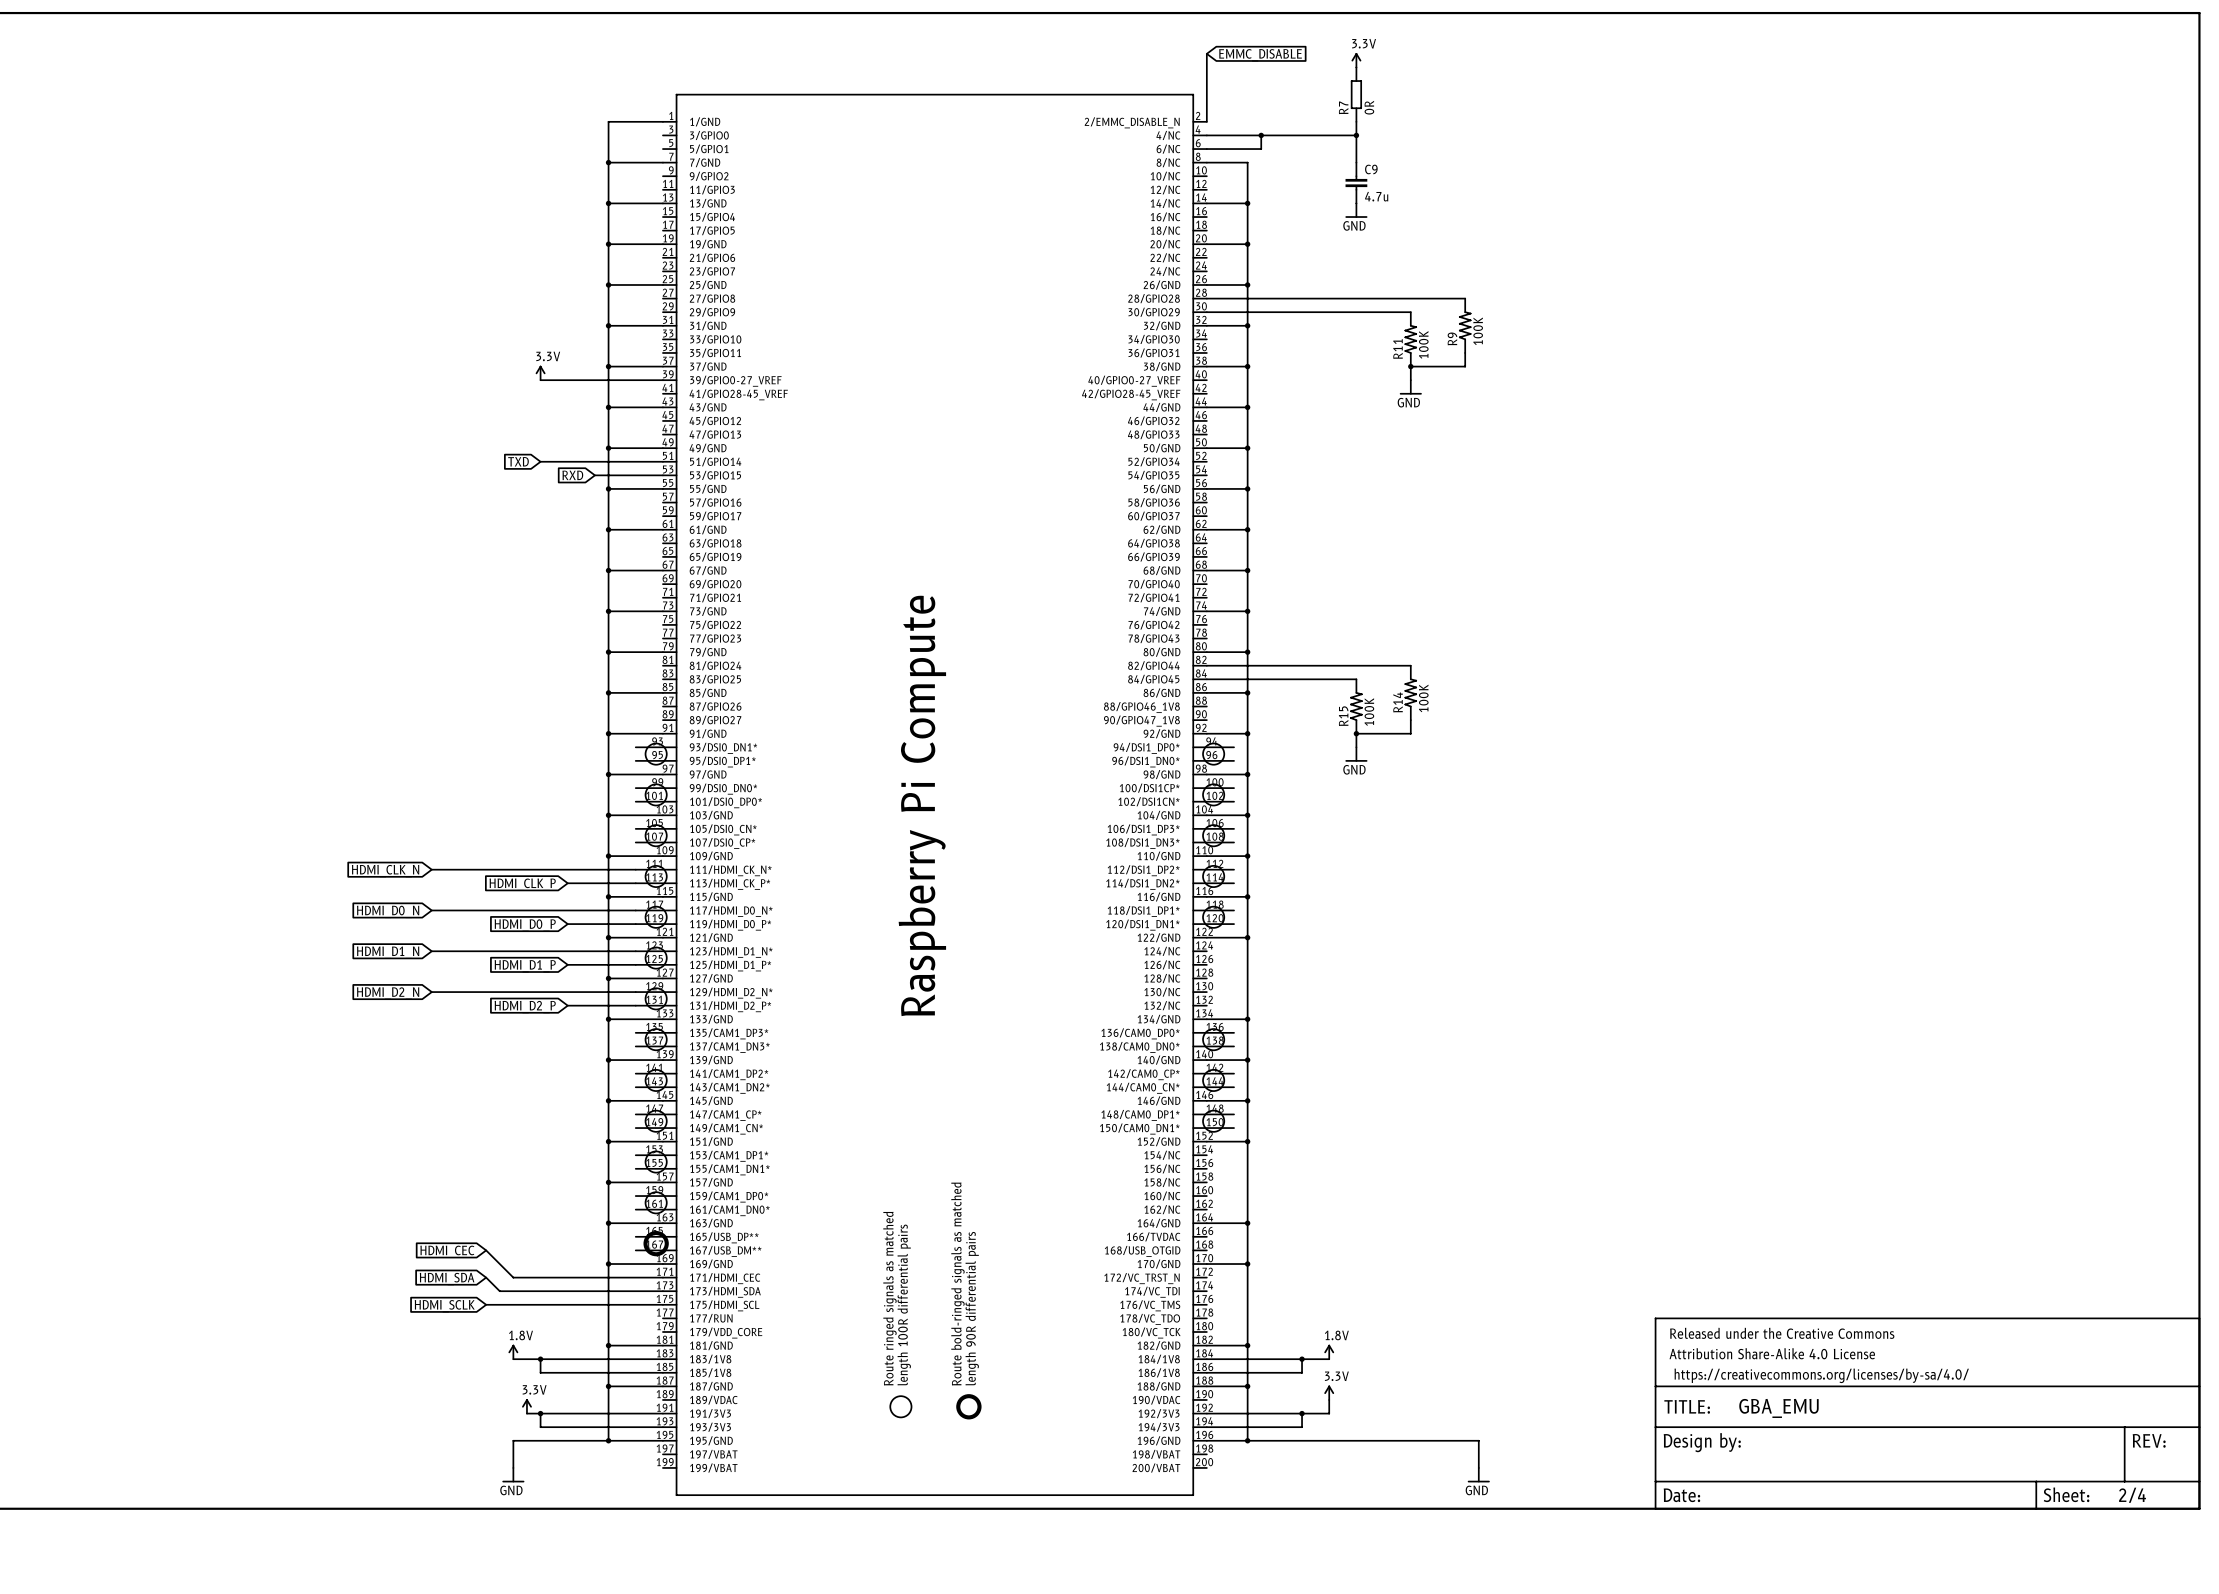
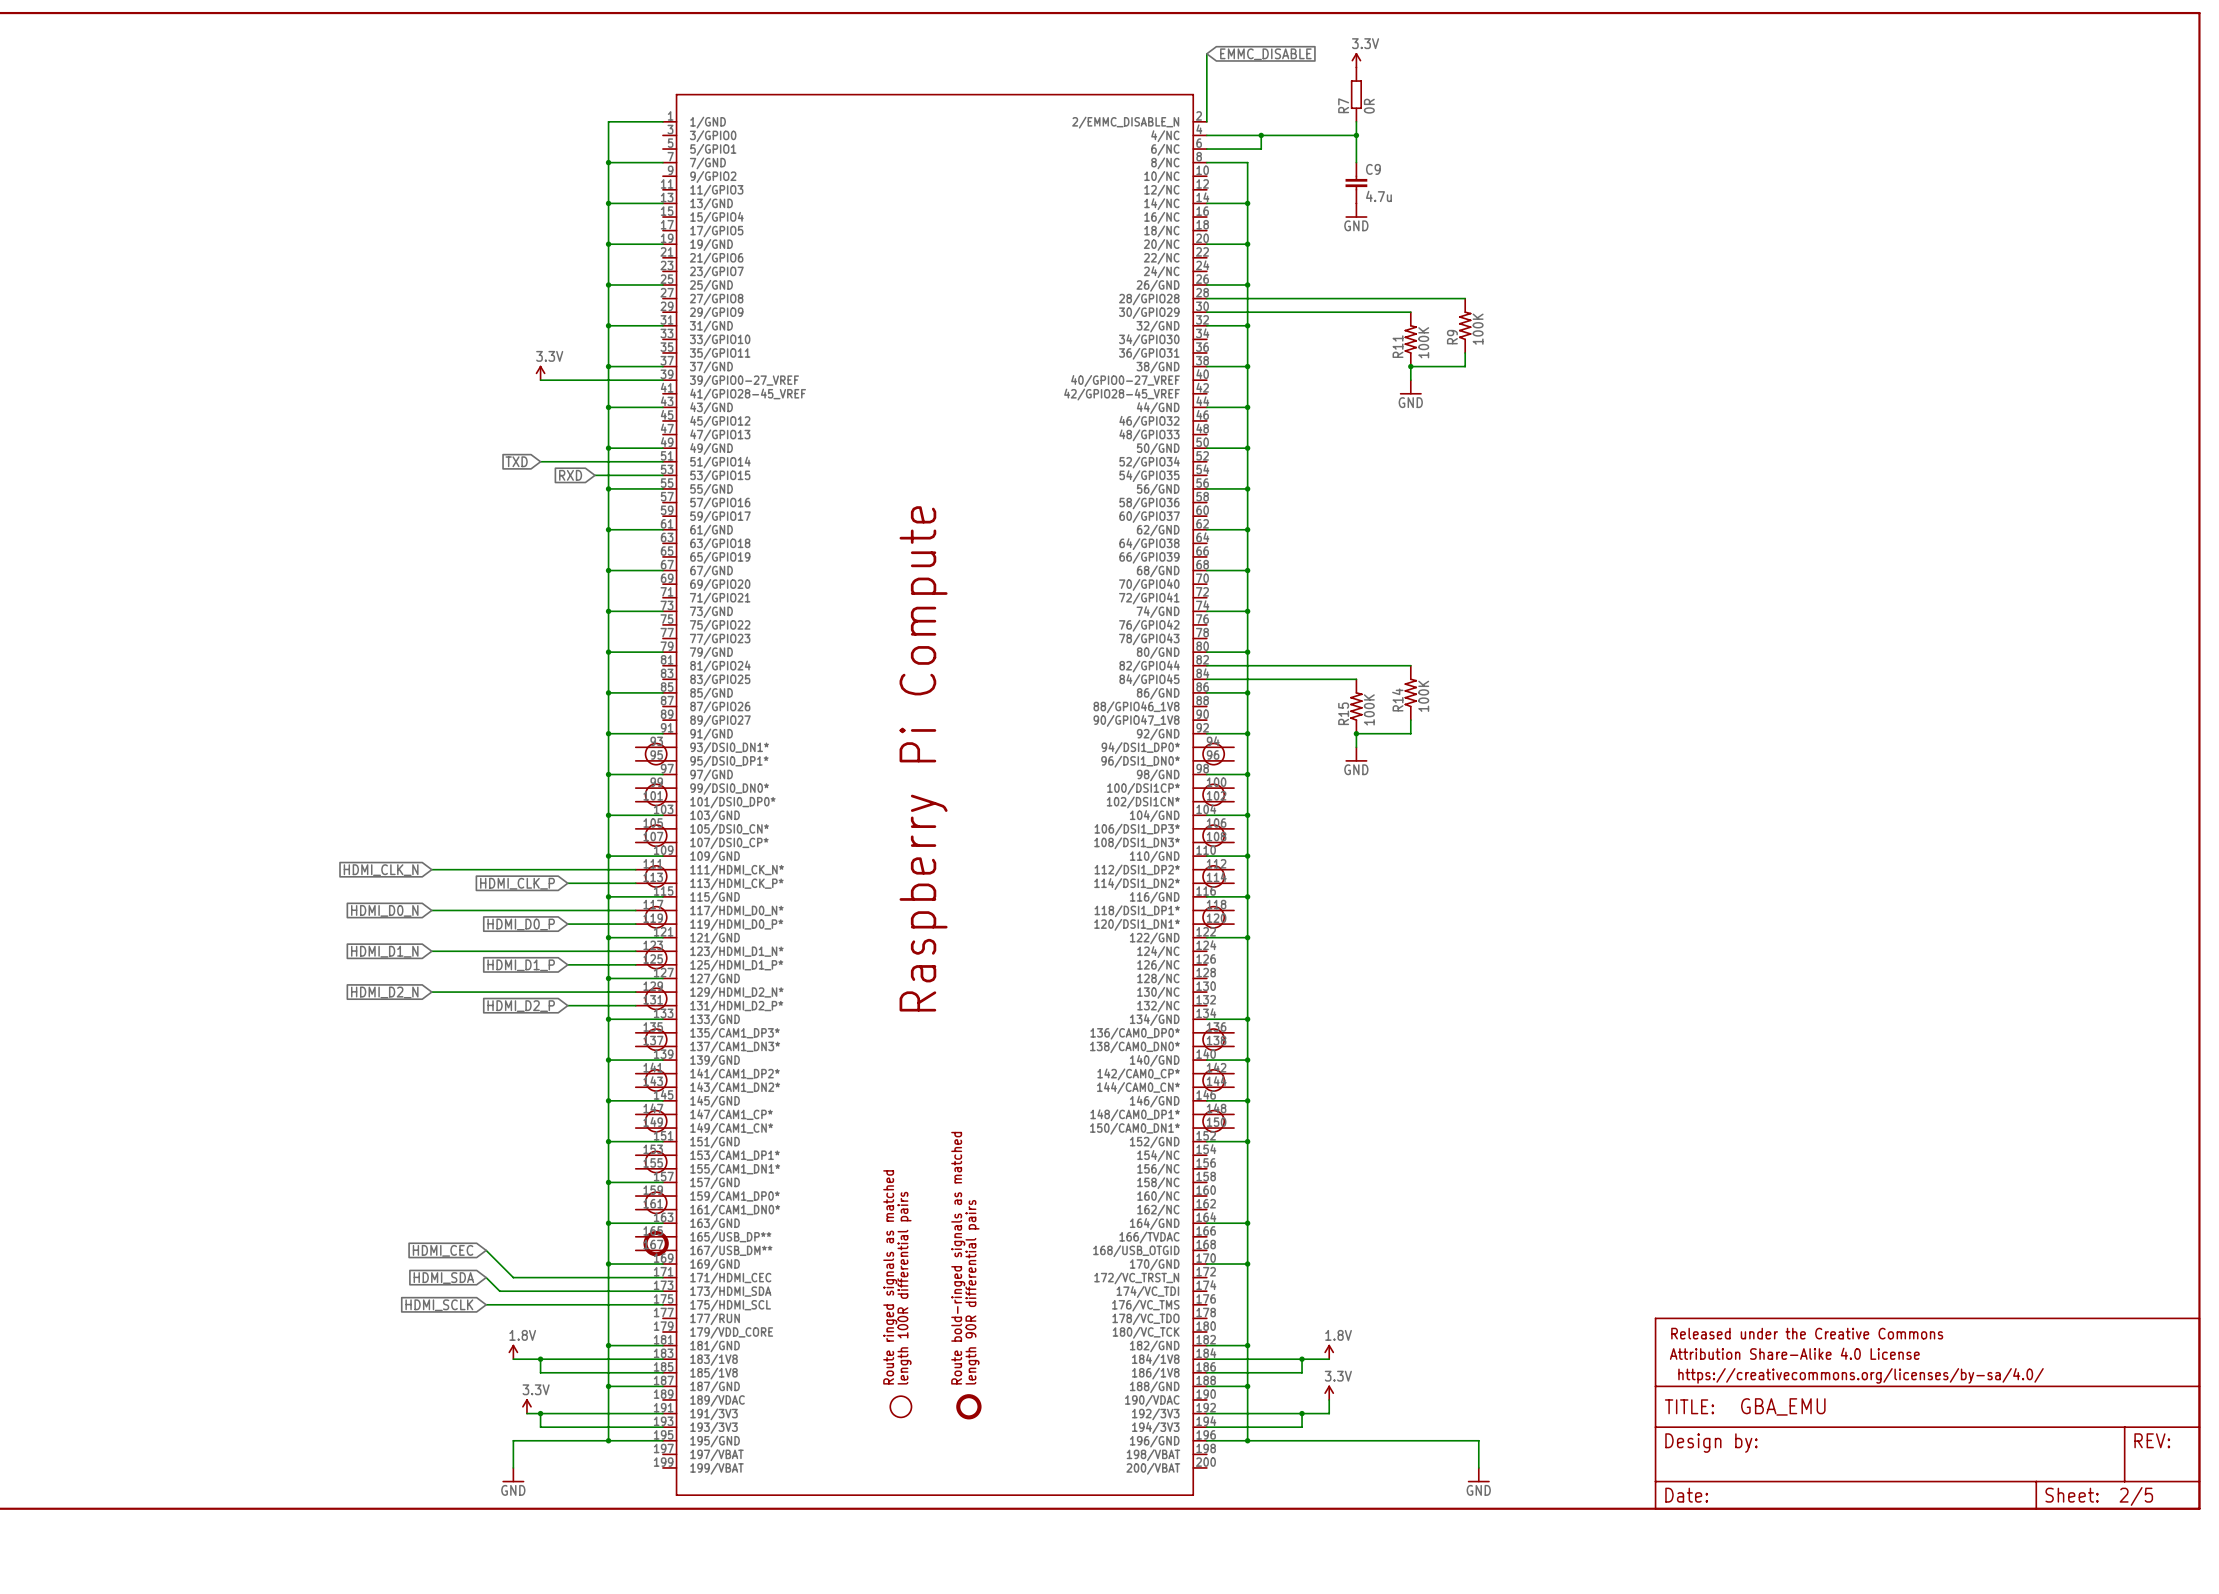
part text: 2/4 (2132, 1495) -> 2/5 (2136, 1496)

